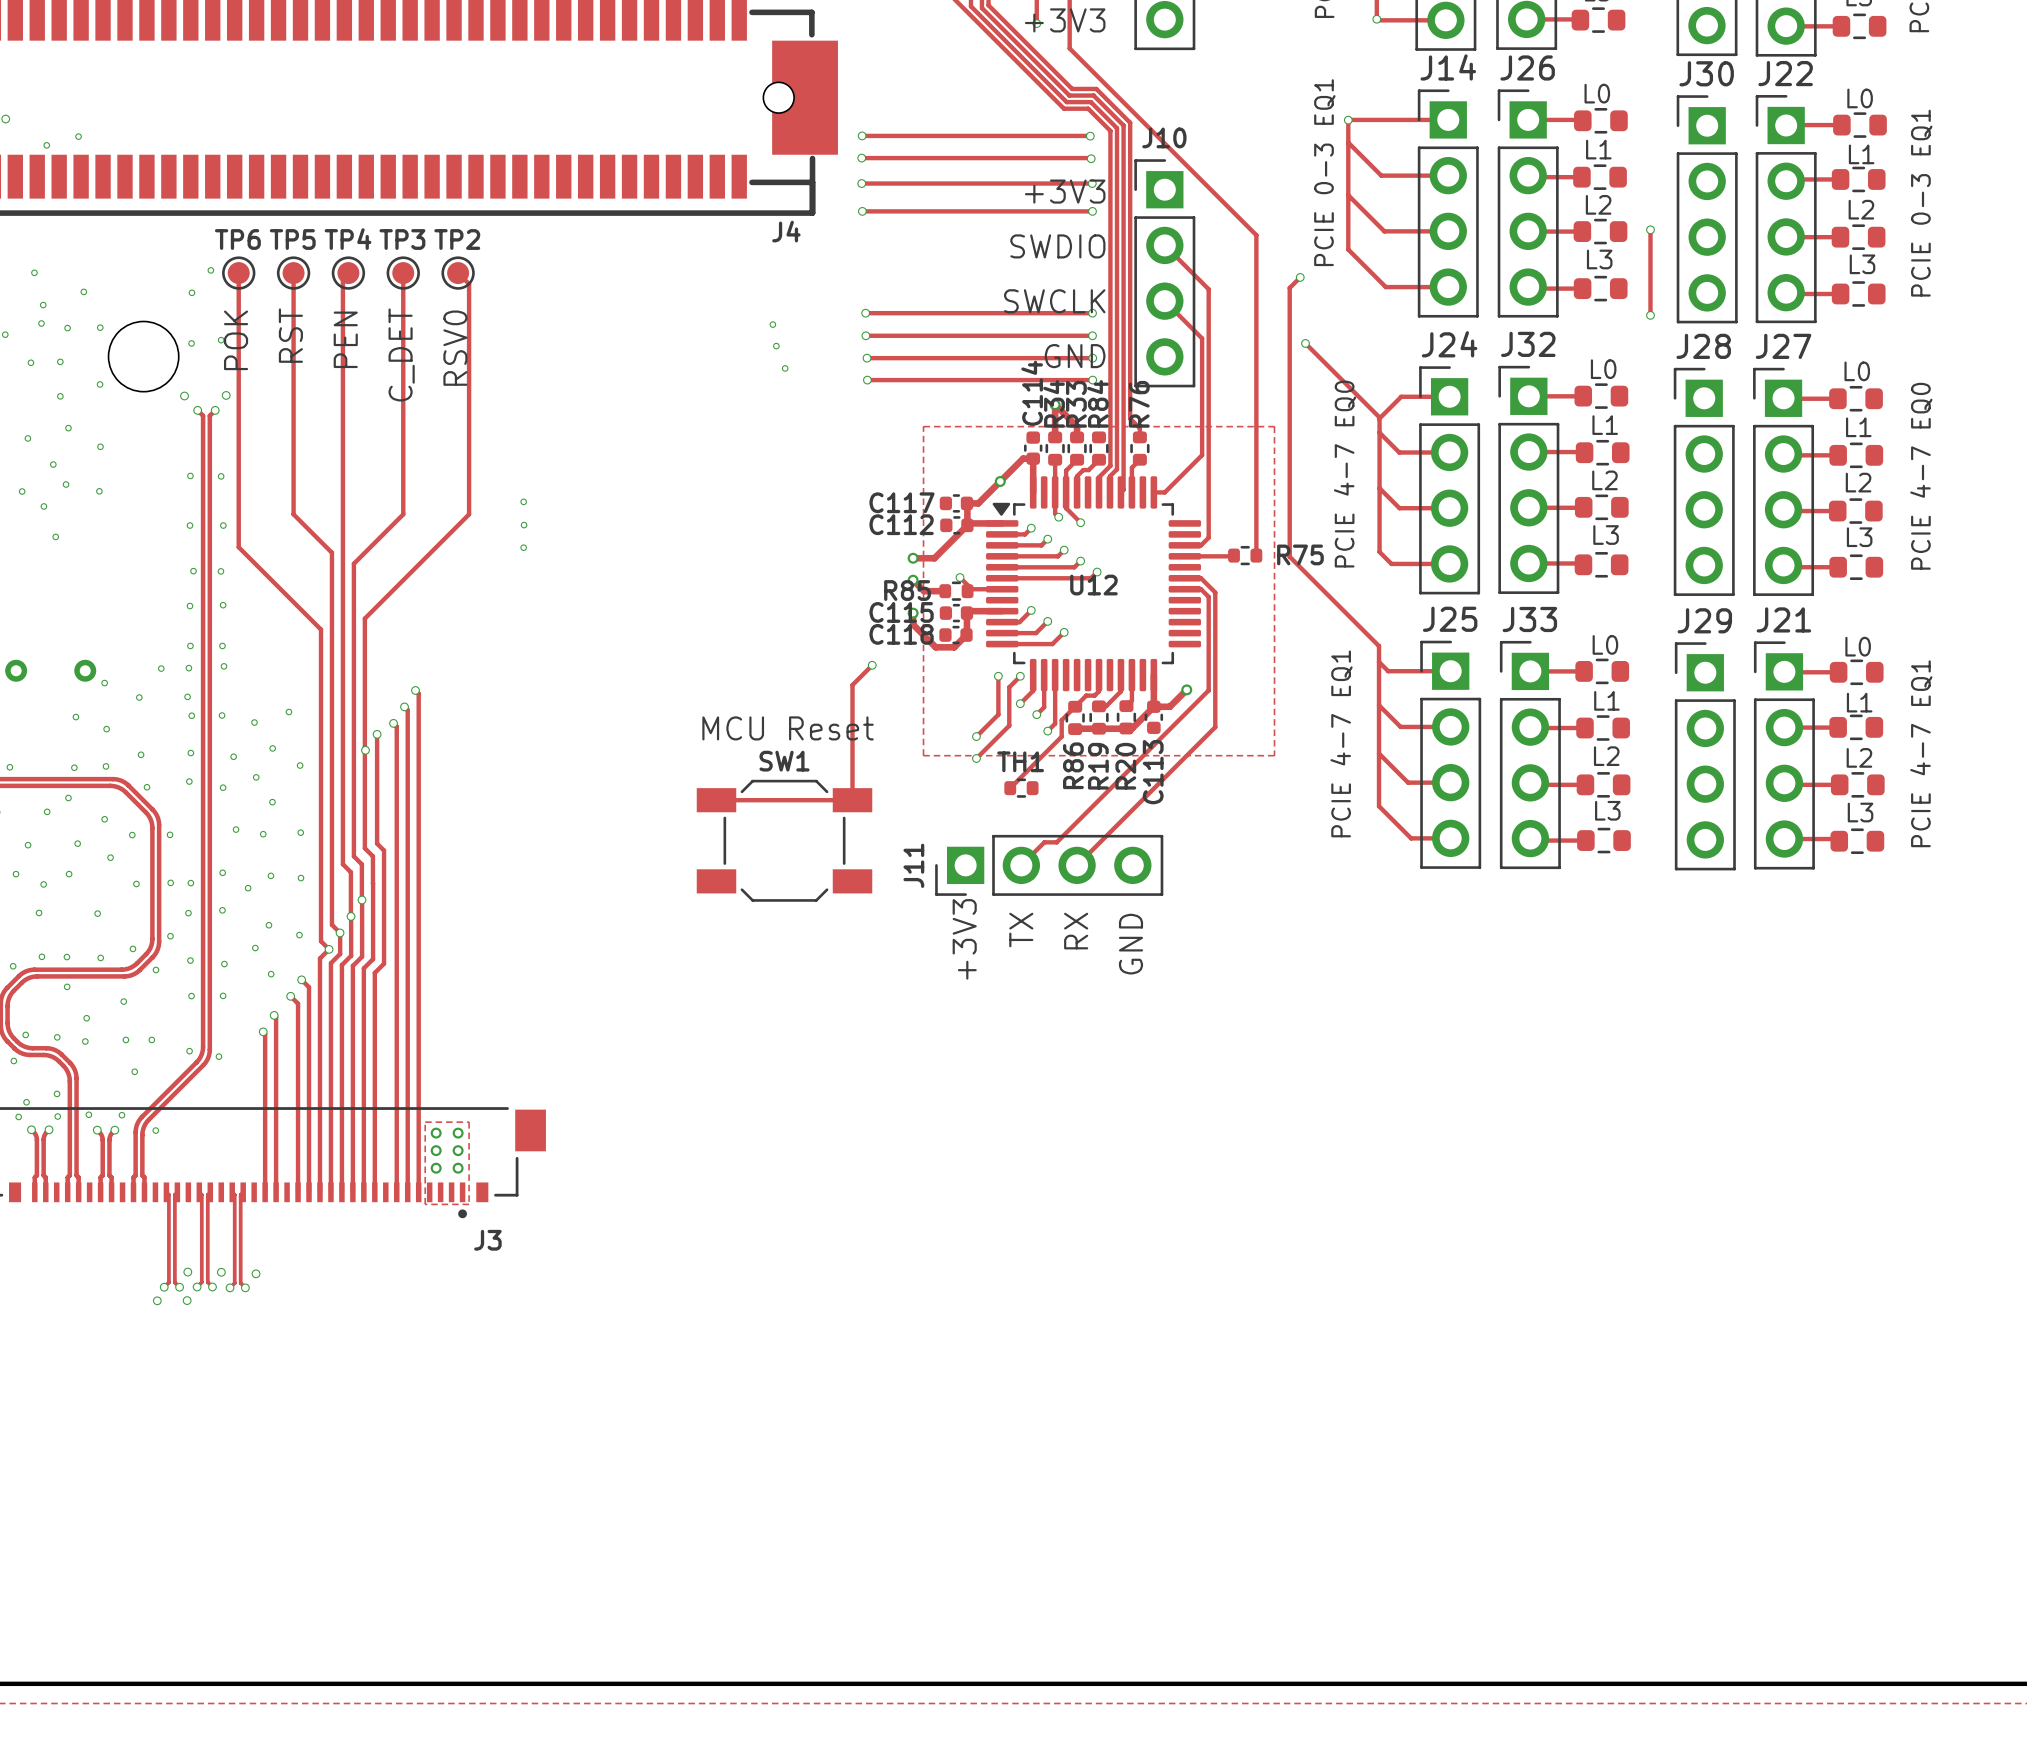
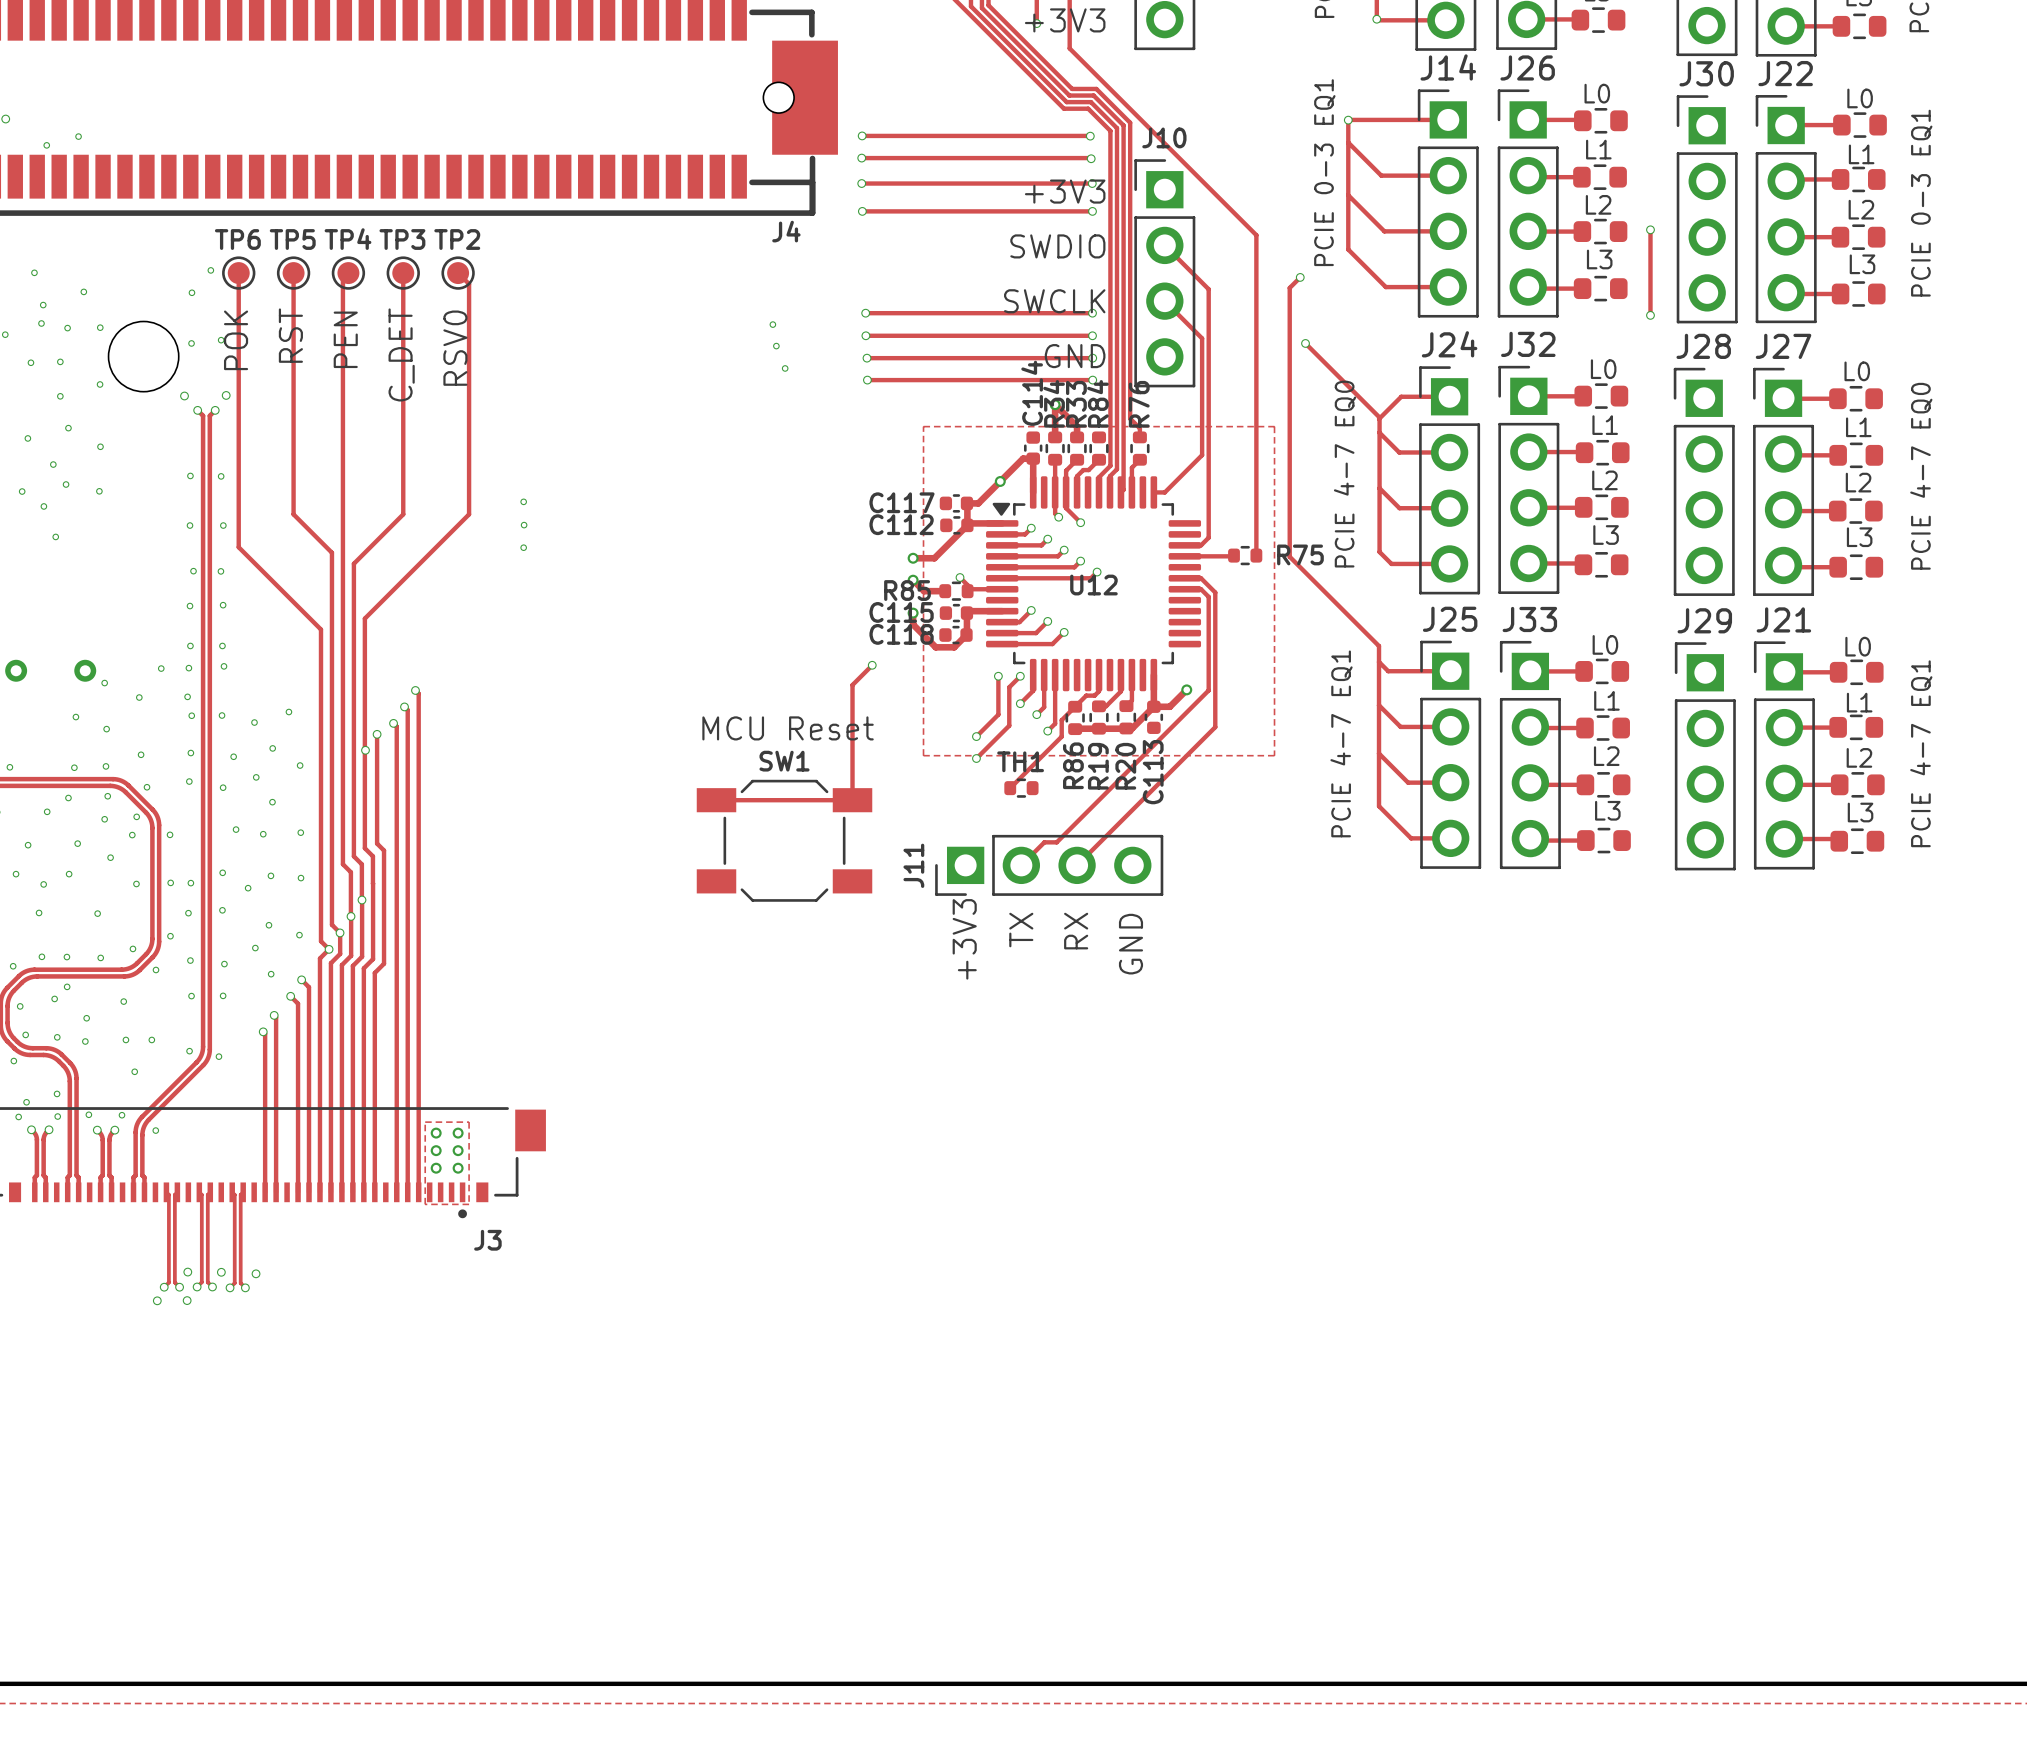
via: none -> (107, 796)
via: none -> (136, 816)
via: none -> (54, 998)
via: none -> (20, 1006)

